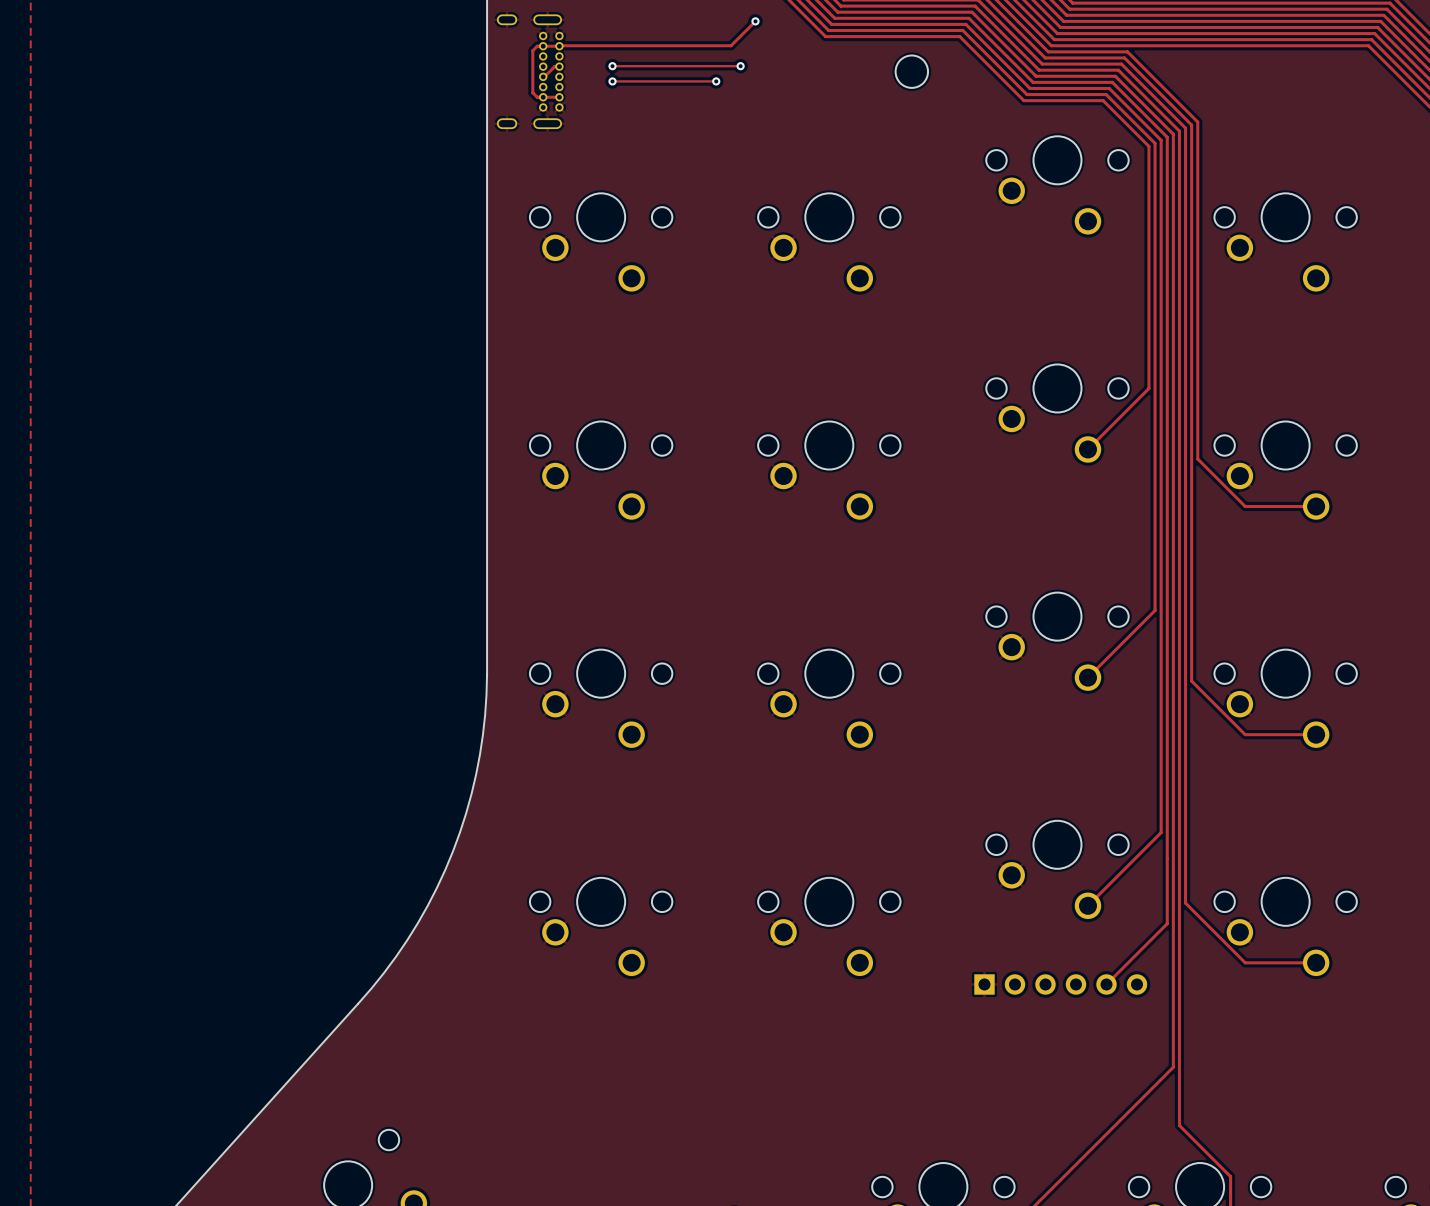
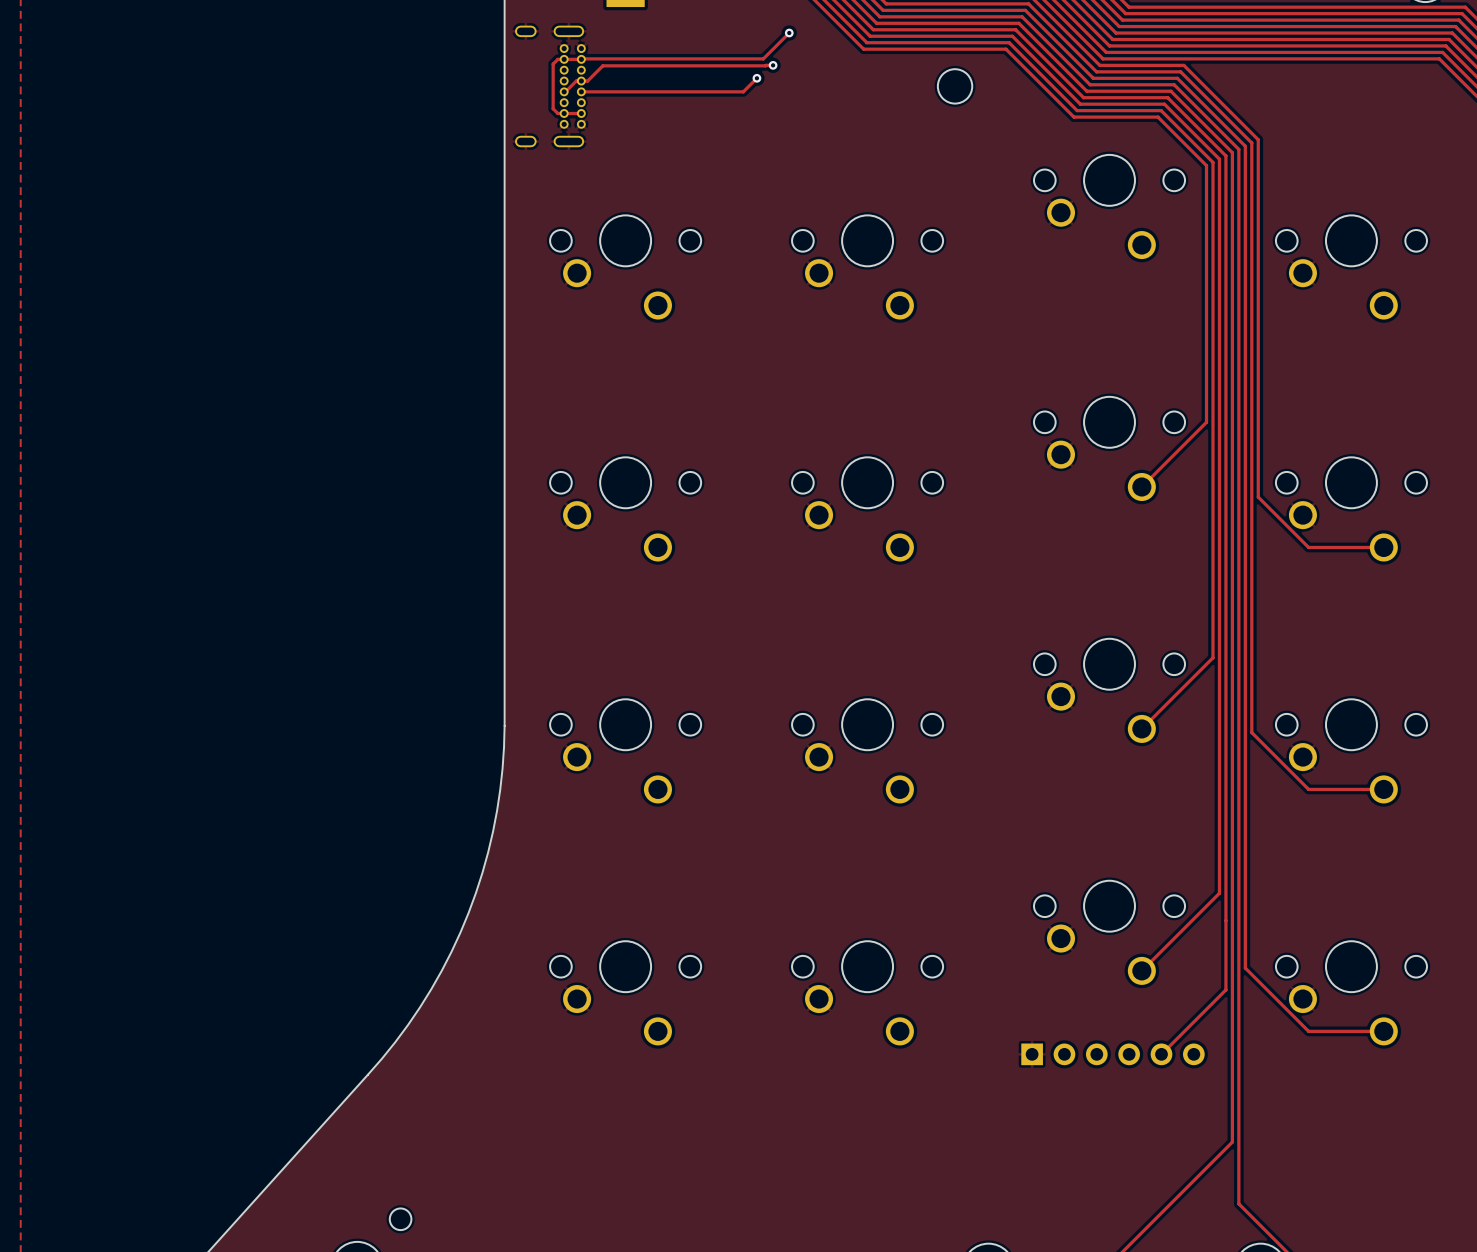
track: none -> (773, 65) (602, 65) (587, 81) (581, 81)
via: none -> (773, 65)
track: none -> (756, 78) (743, 91) (581, 91)
via: none -> (756, 78)
track: (612, 66) (740, 66) -> none
via: (612, 66) -> none
via: (740, 66) -> none
track: (612, 81) (716, 81) -> none
via: (612, 81) -> none
via: (716, 81) -> none

